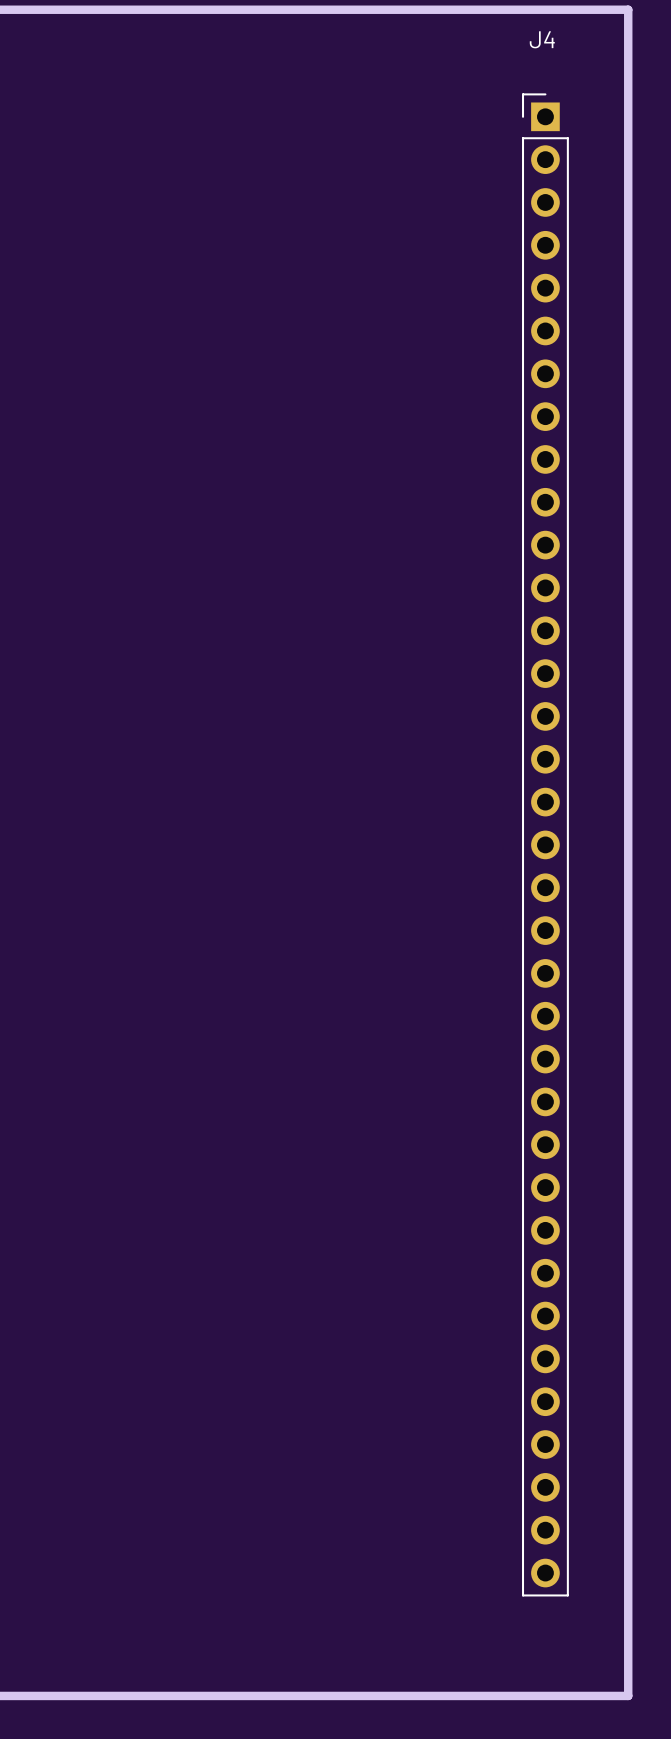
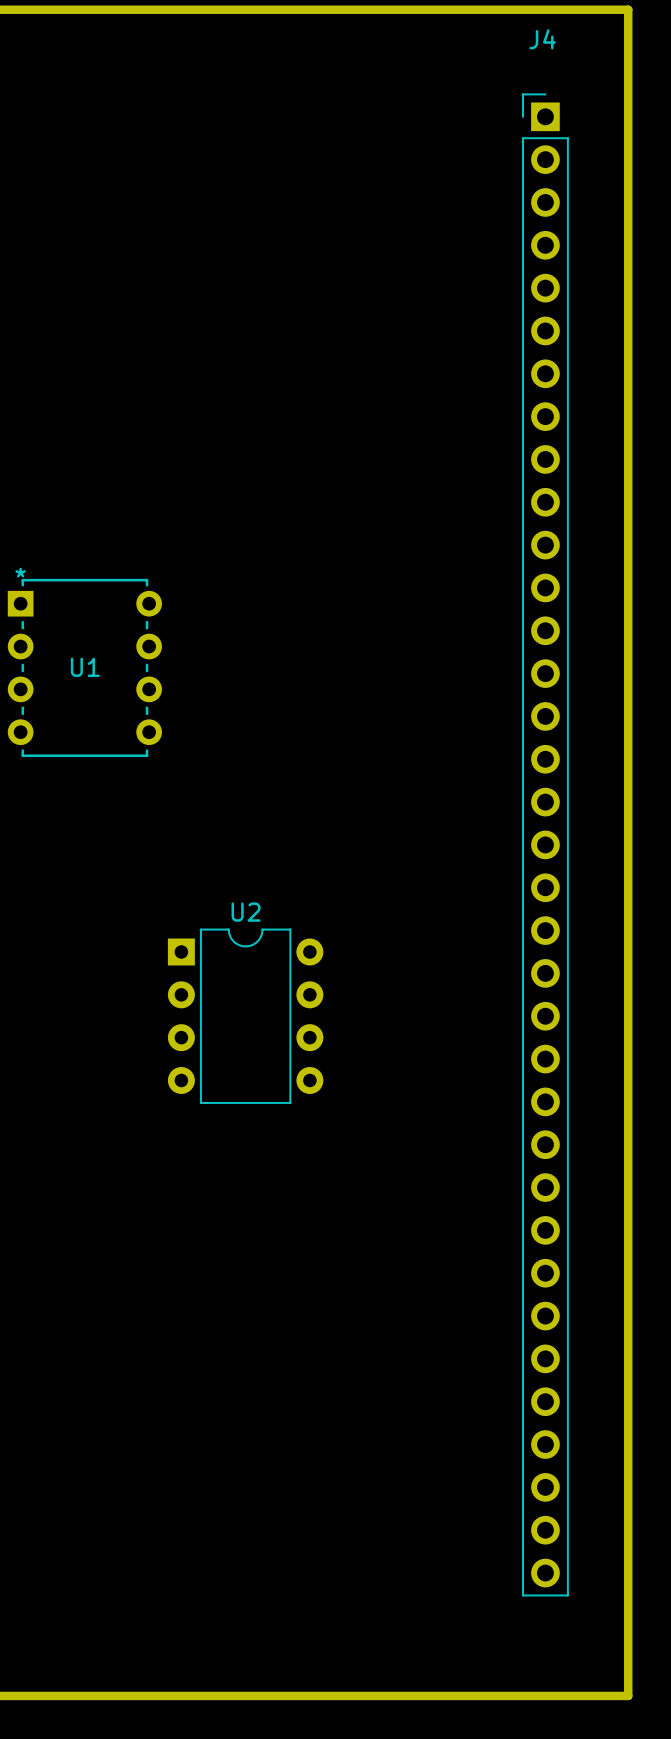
U1: none -> (84, 667)
U2: none -> (245, 1016)

